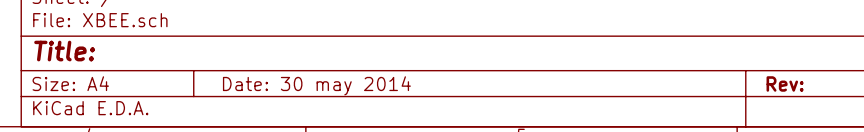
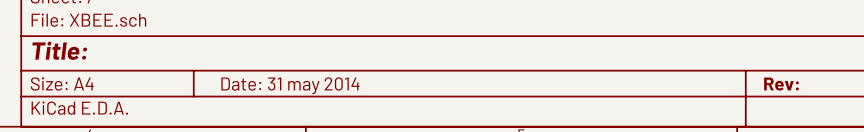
title block: Date: 30 may 2014 (316, 85) -> Date: 31 may 2014 (290, 85)

